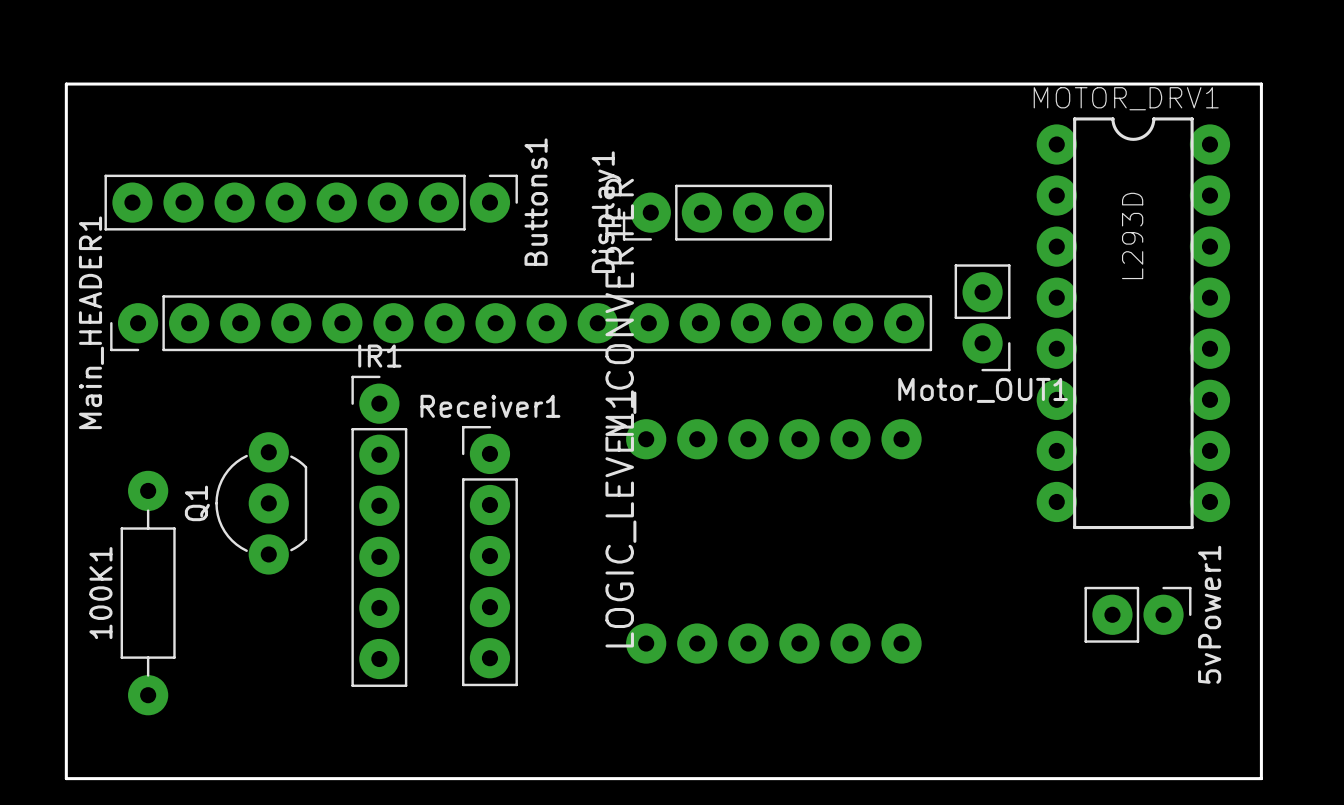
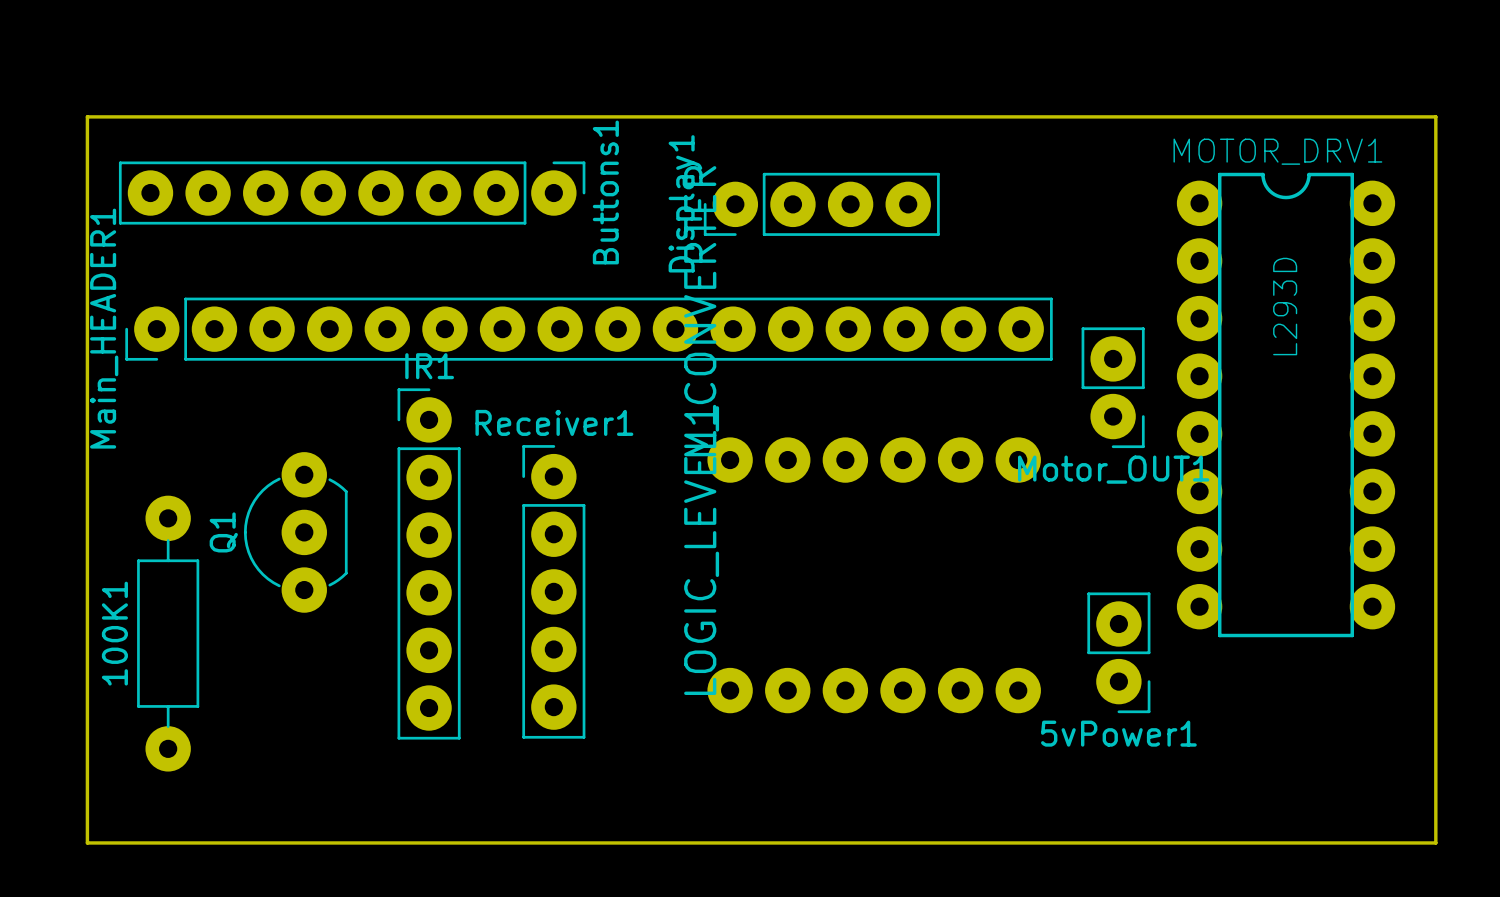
Motor_OUT1 position: (982, 317) -> (1113, 387)
MOTOR_DRV1 position: (1133, 323) -> (1286, 405)
5vPower1 rotation: 0° (1138, 614) -> 90° clockwise (1118, 652)
5vPower1 position: (1138, 614) -> (1118, 652)
board edge: (76, 778) (66, 778) (66, 84) (1261, 84) (1261, 778) -> (87, 842) (87, 116) (1435, 116) (1435, 842) (1424, 842)

